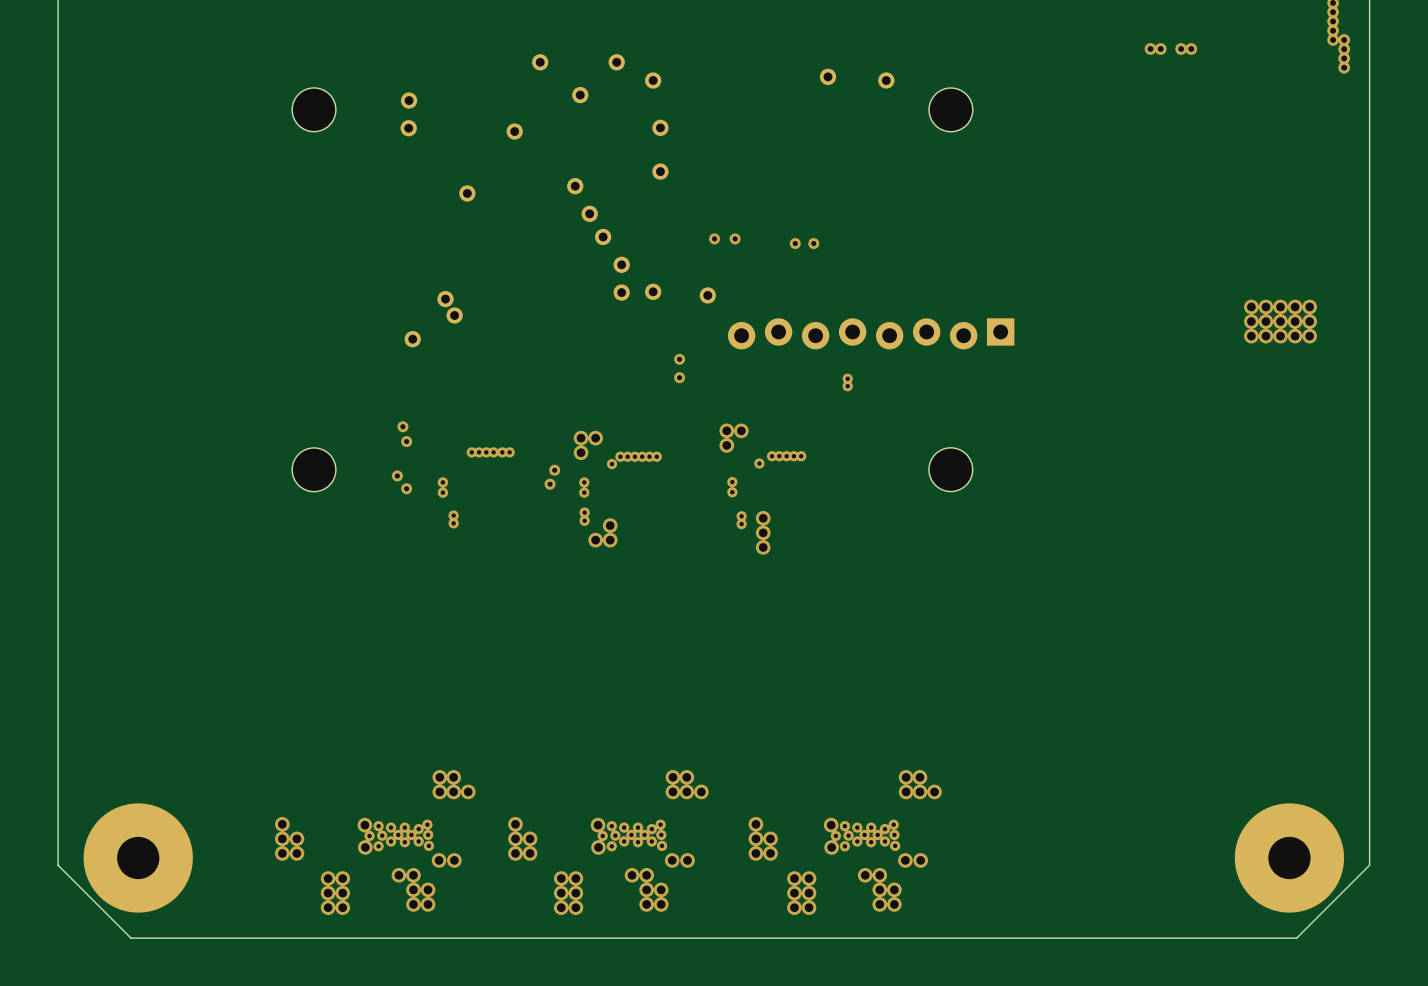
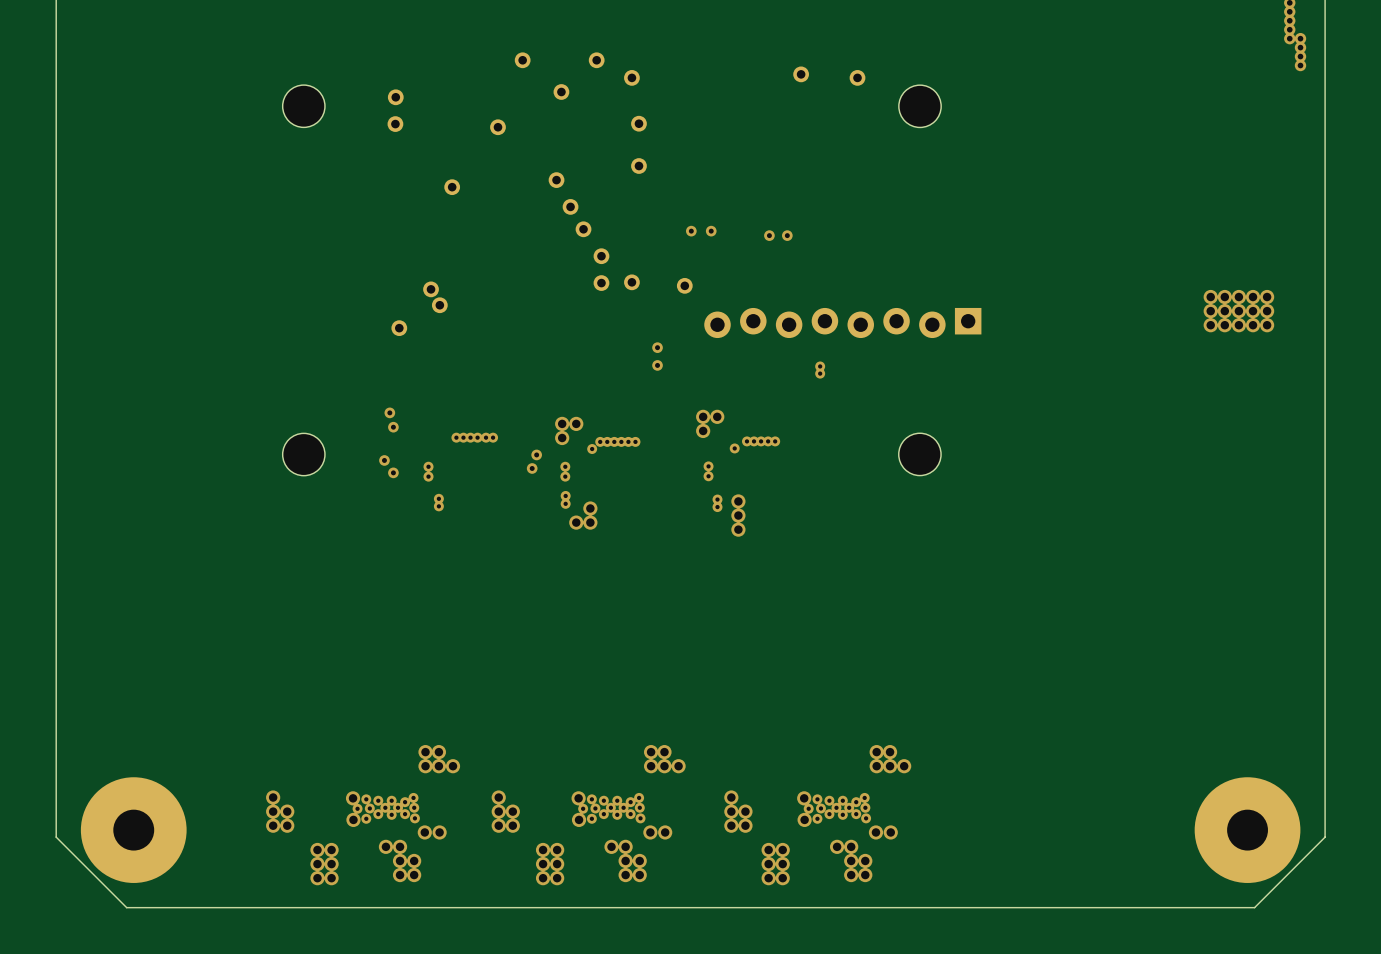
via: (1150, 48) -> none
via: (1160, 48) -> none
via: (1181, 48) -> none
via: (1191, 48) -> none

